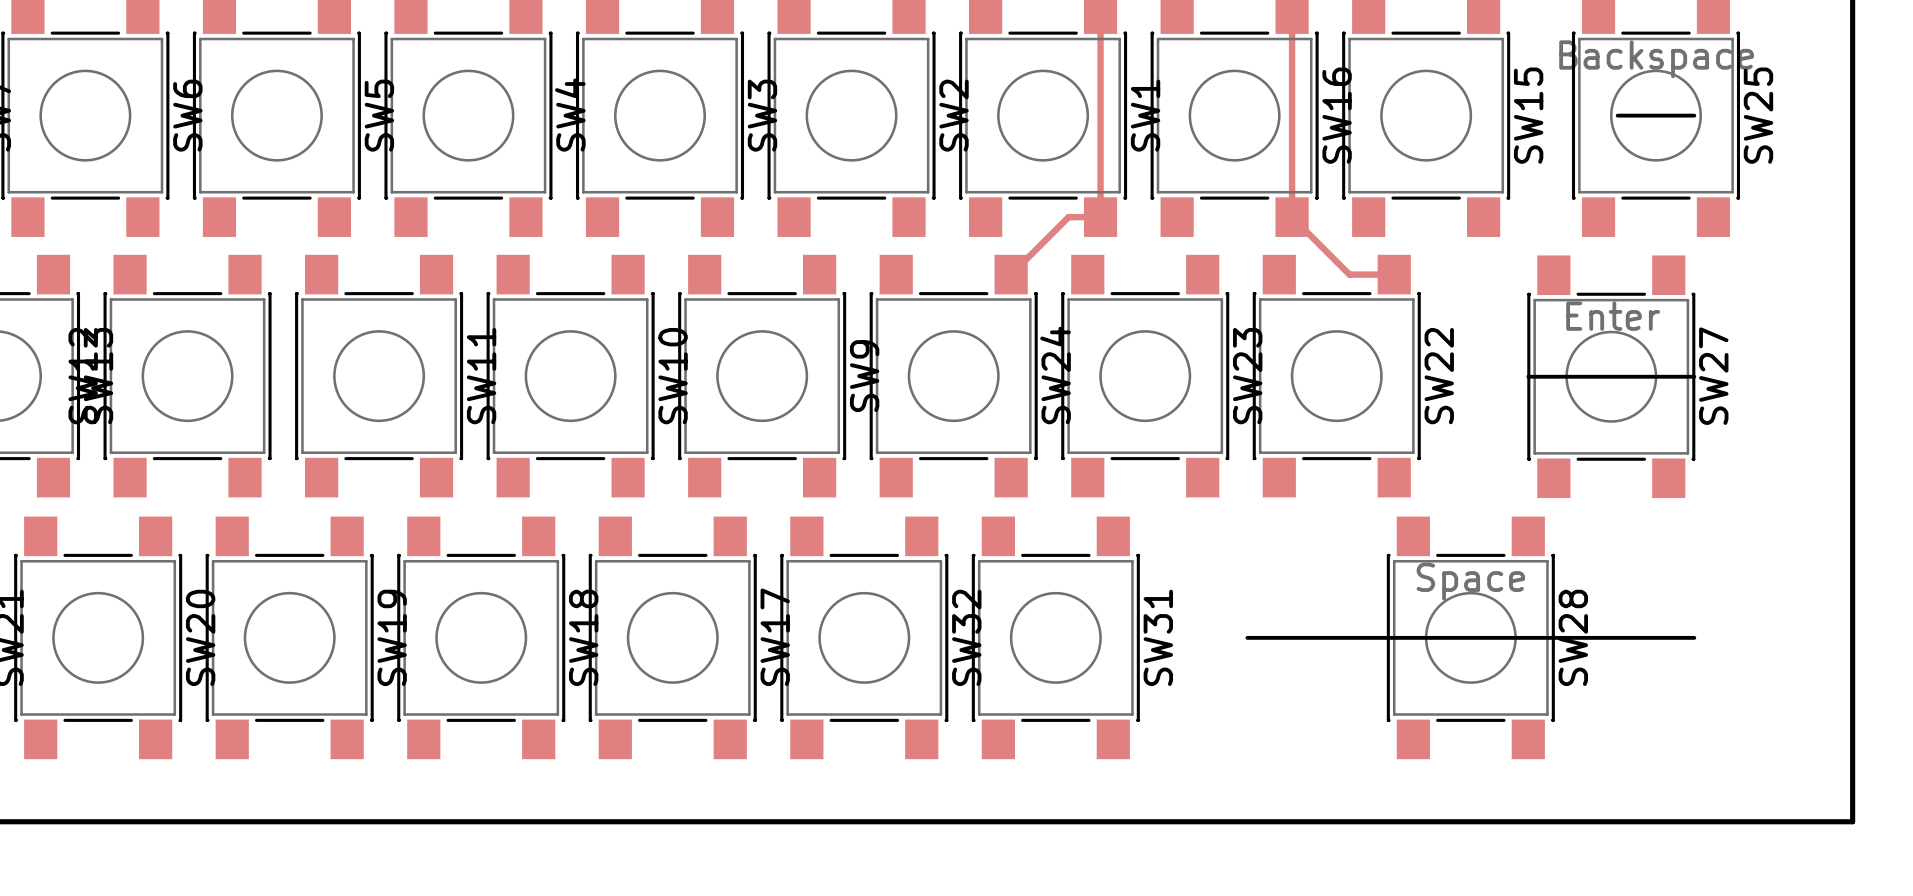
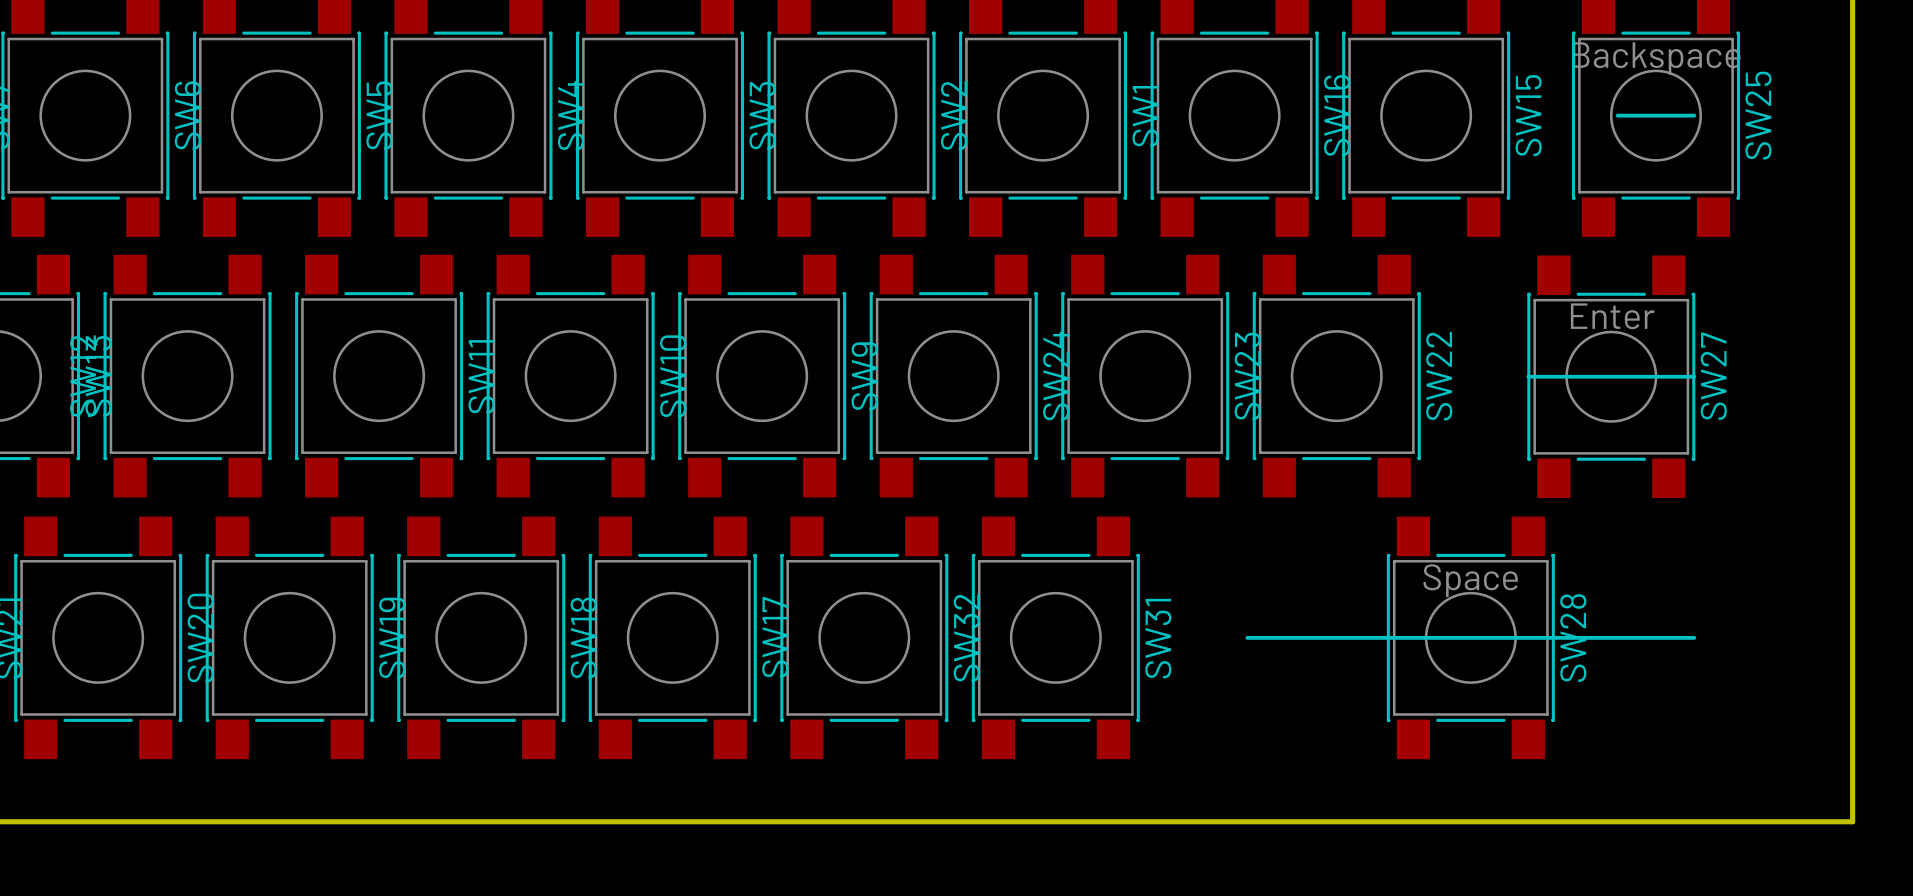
track: (1100, 14) (1100, 217) (1068, 217) (1011, 274) -> none
track: (1292, 14) (1292, 217) (1349, 274) (1394, 274) -> none

